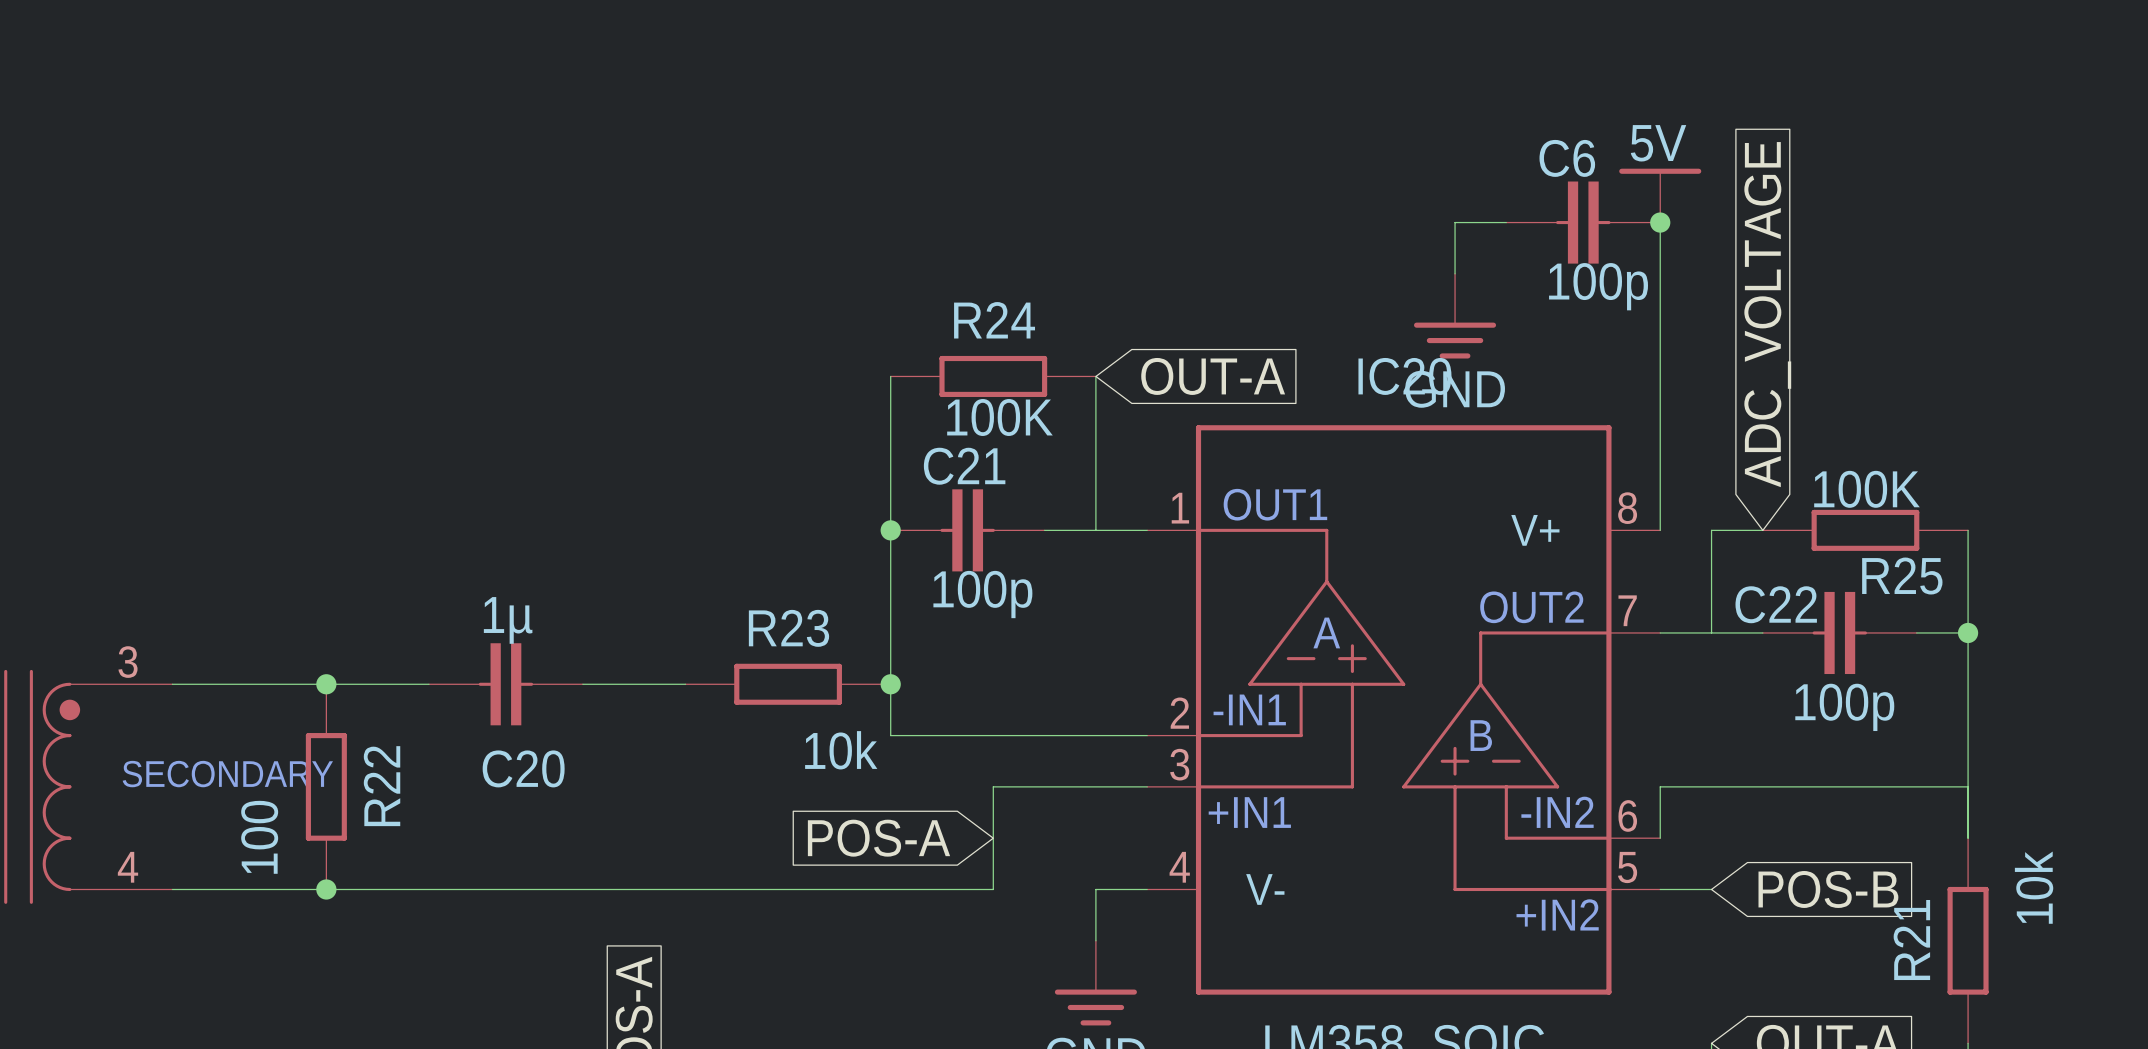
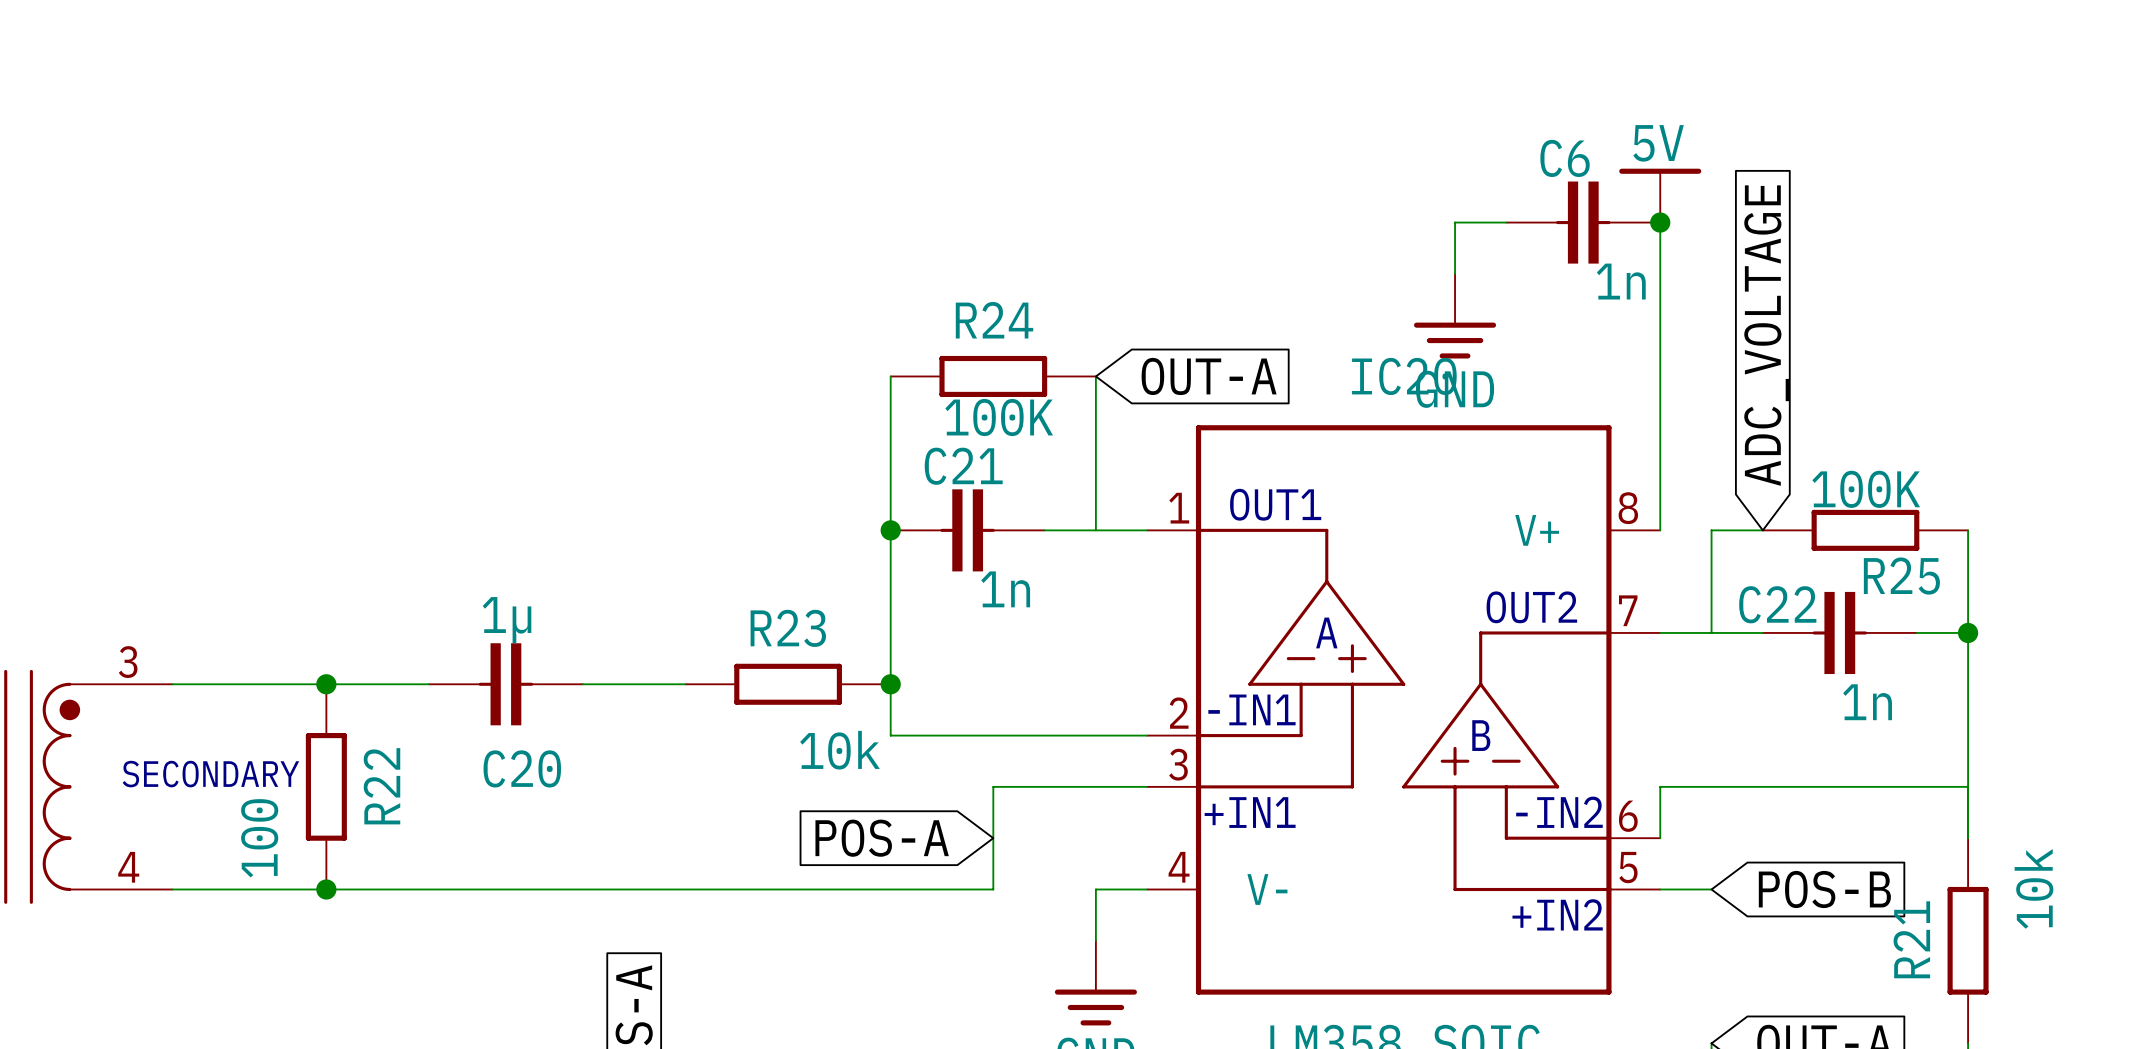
C6 value: 100p (1598, 286) -> 1n (1621, 281)
C21 value: 100p (982, 594) -> 1n (1005, 589)
C22 value: 100p (1844, 707) -> 1n (1867, 702)

